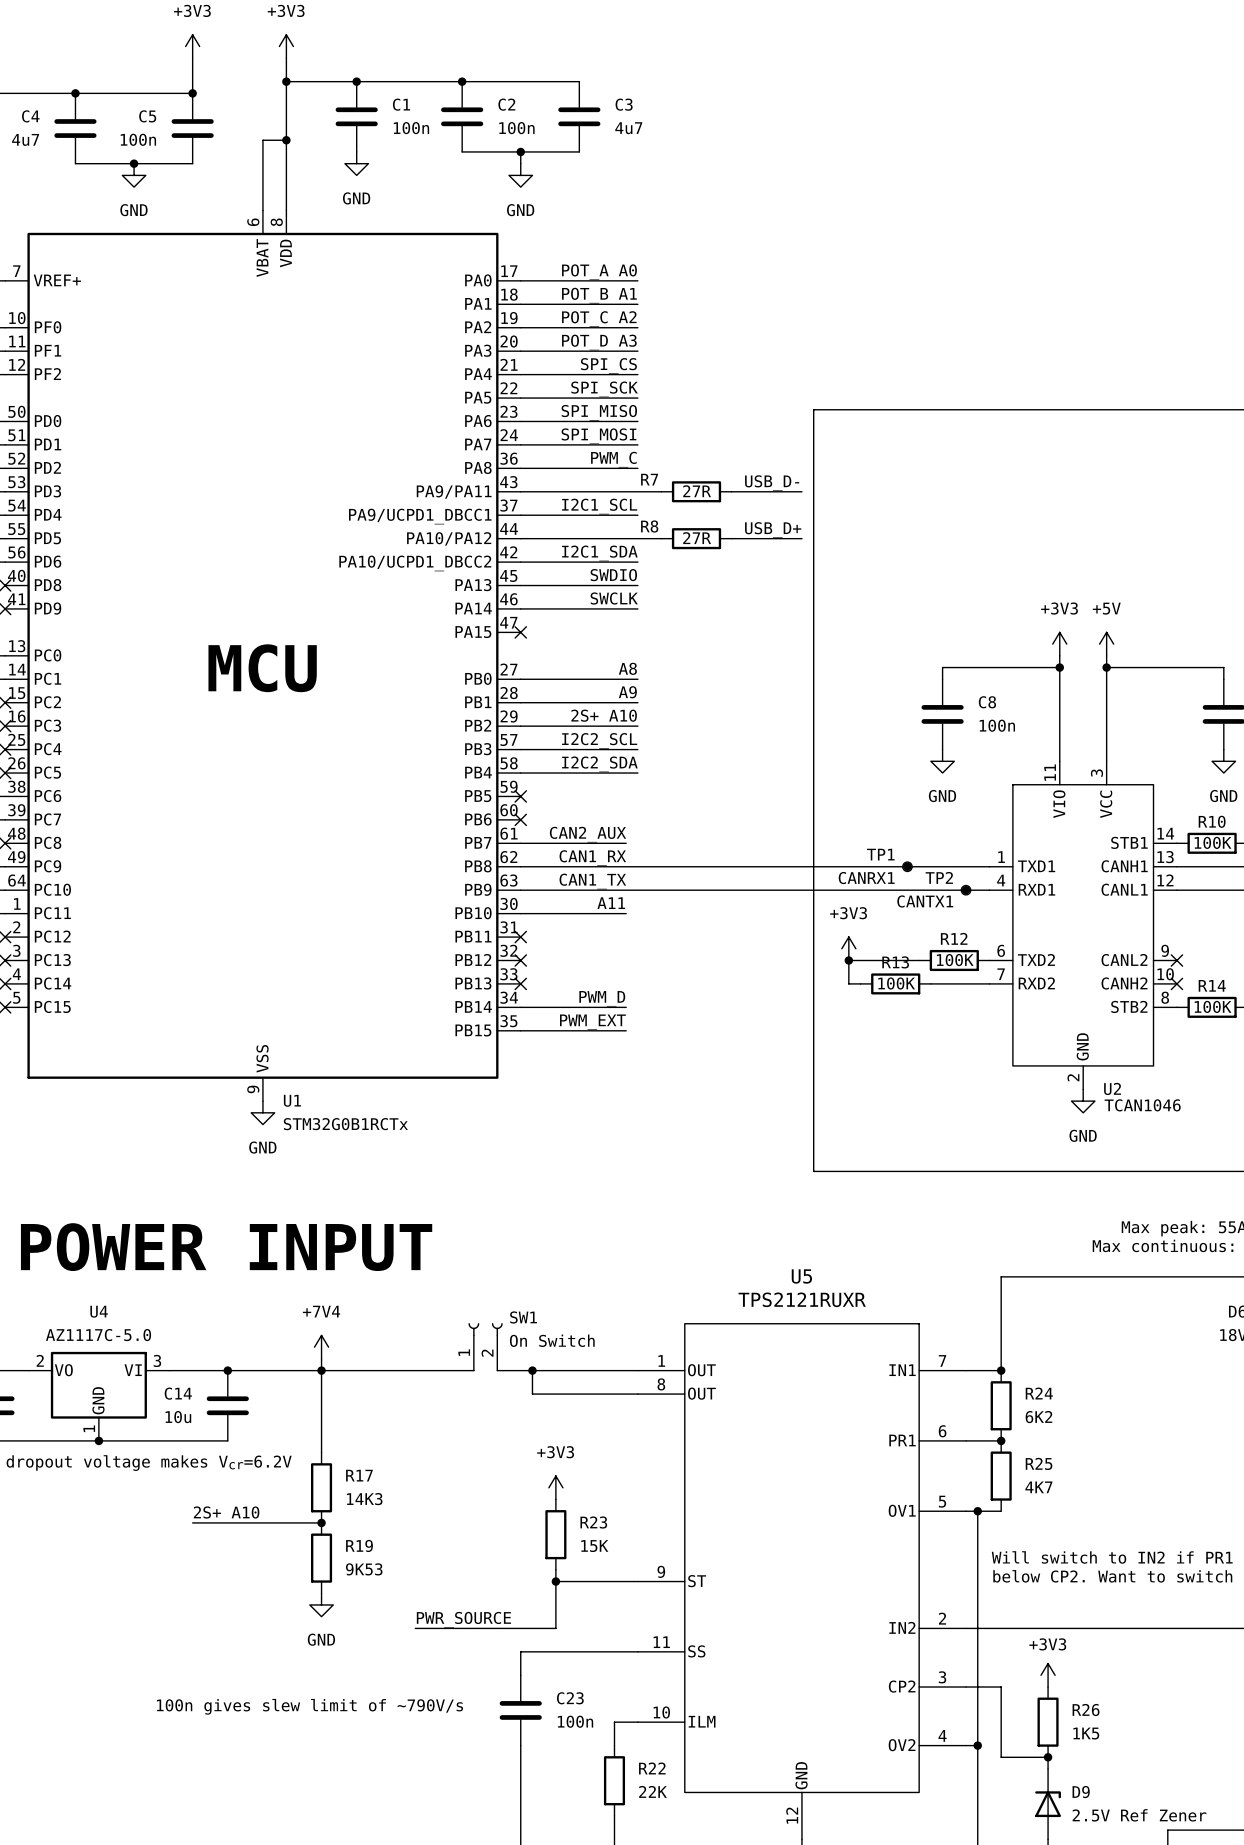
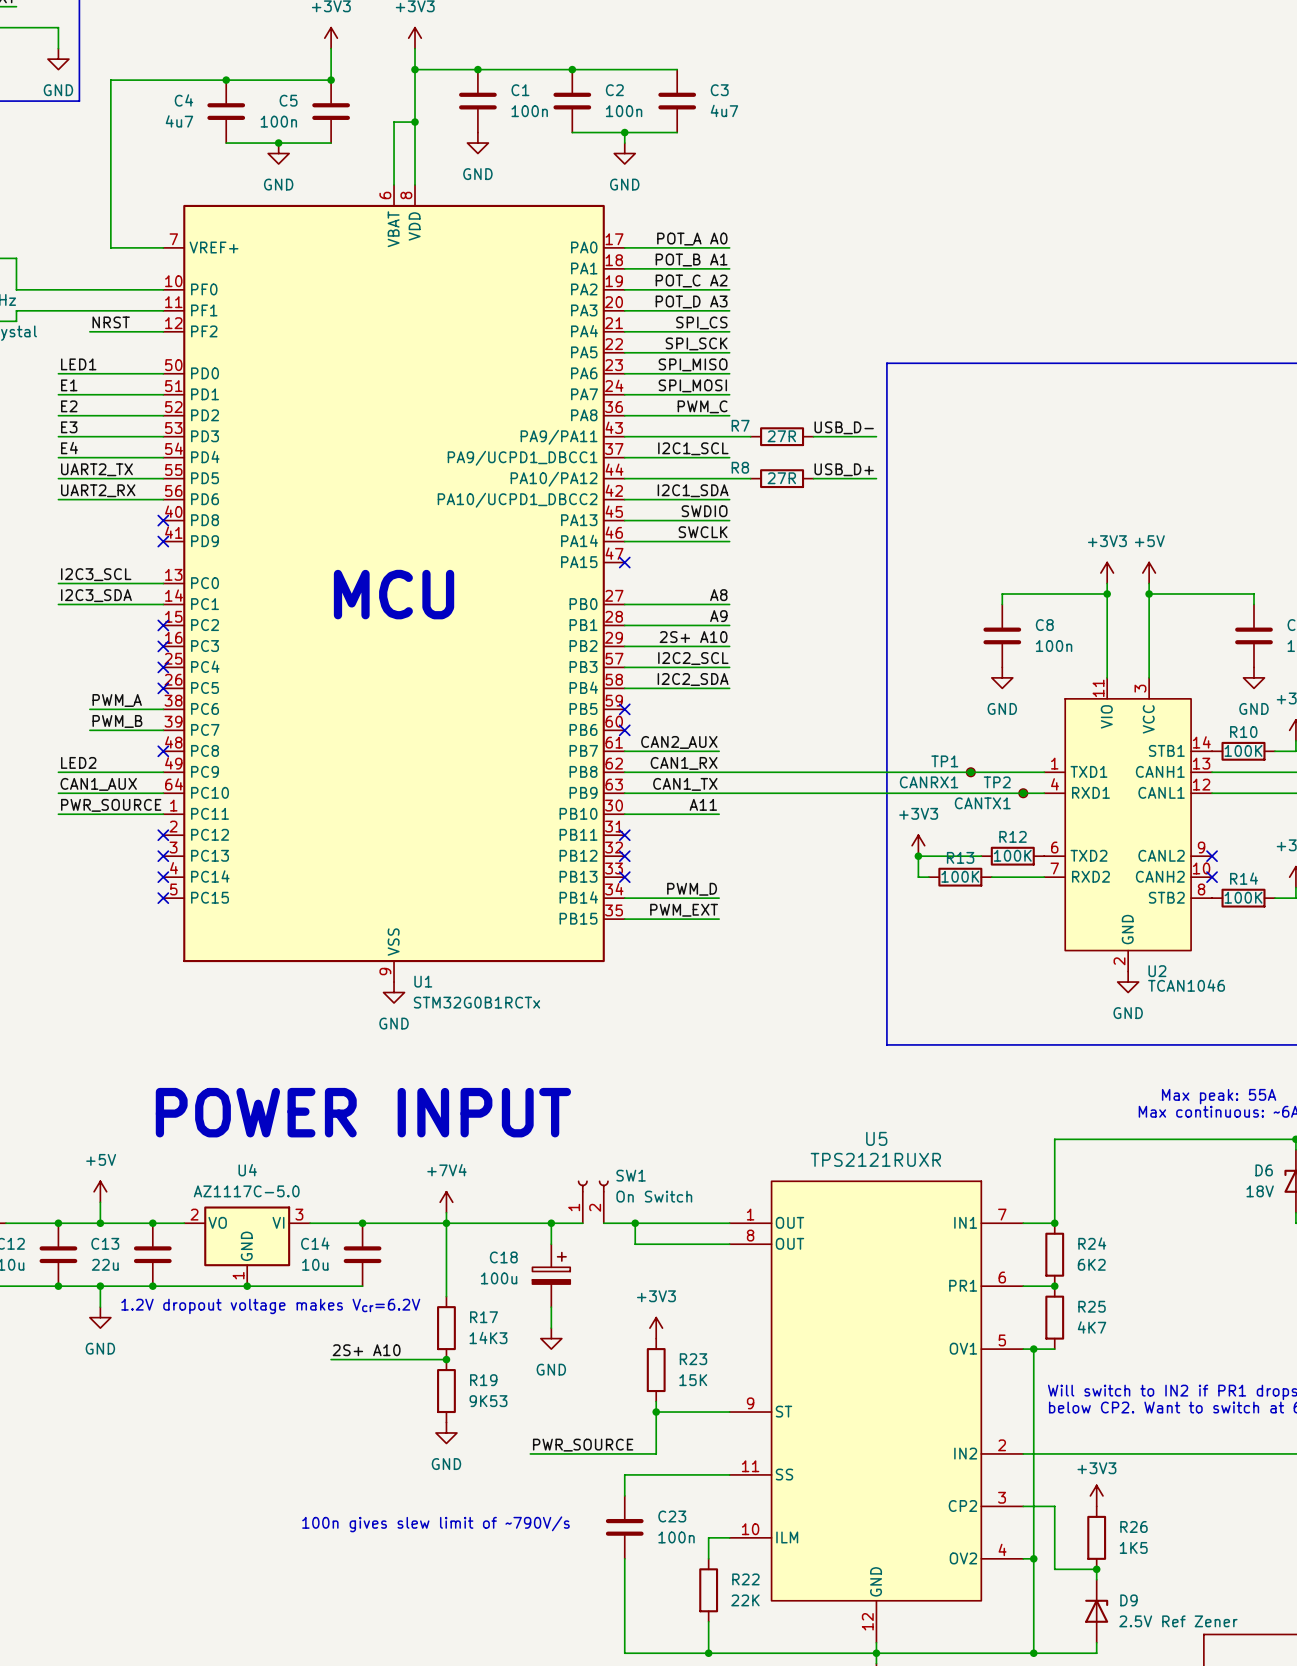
wire: none -> (551, 1223) (551, 1244)
junction: none -> (551, 1223)
C18: none -> 100u (551, 1275)
wire: none -> (551, 1307) (551, 1328)
power symbol: none -> GND (551, 1338)

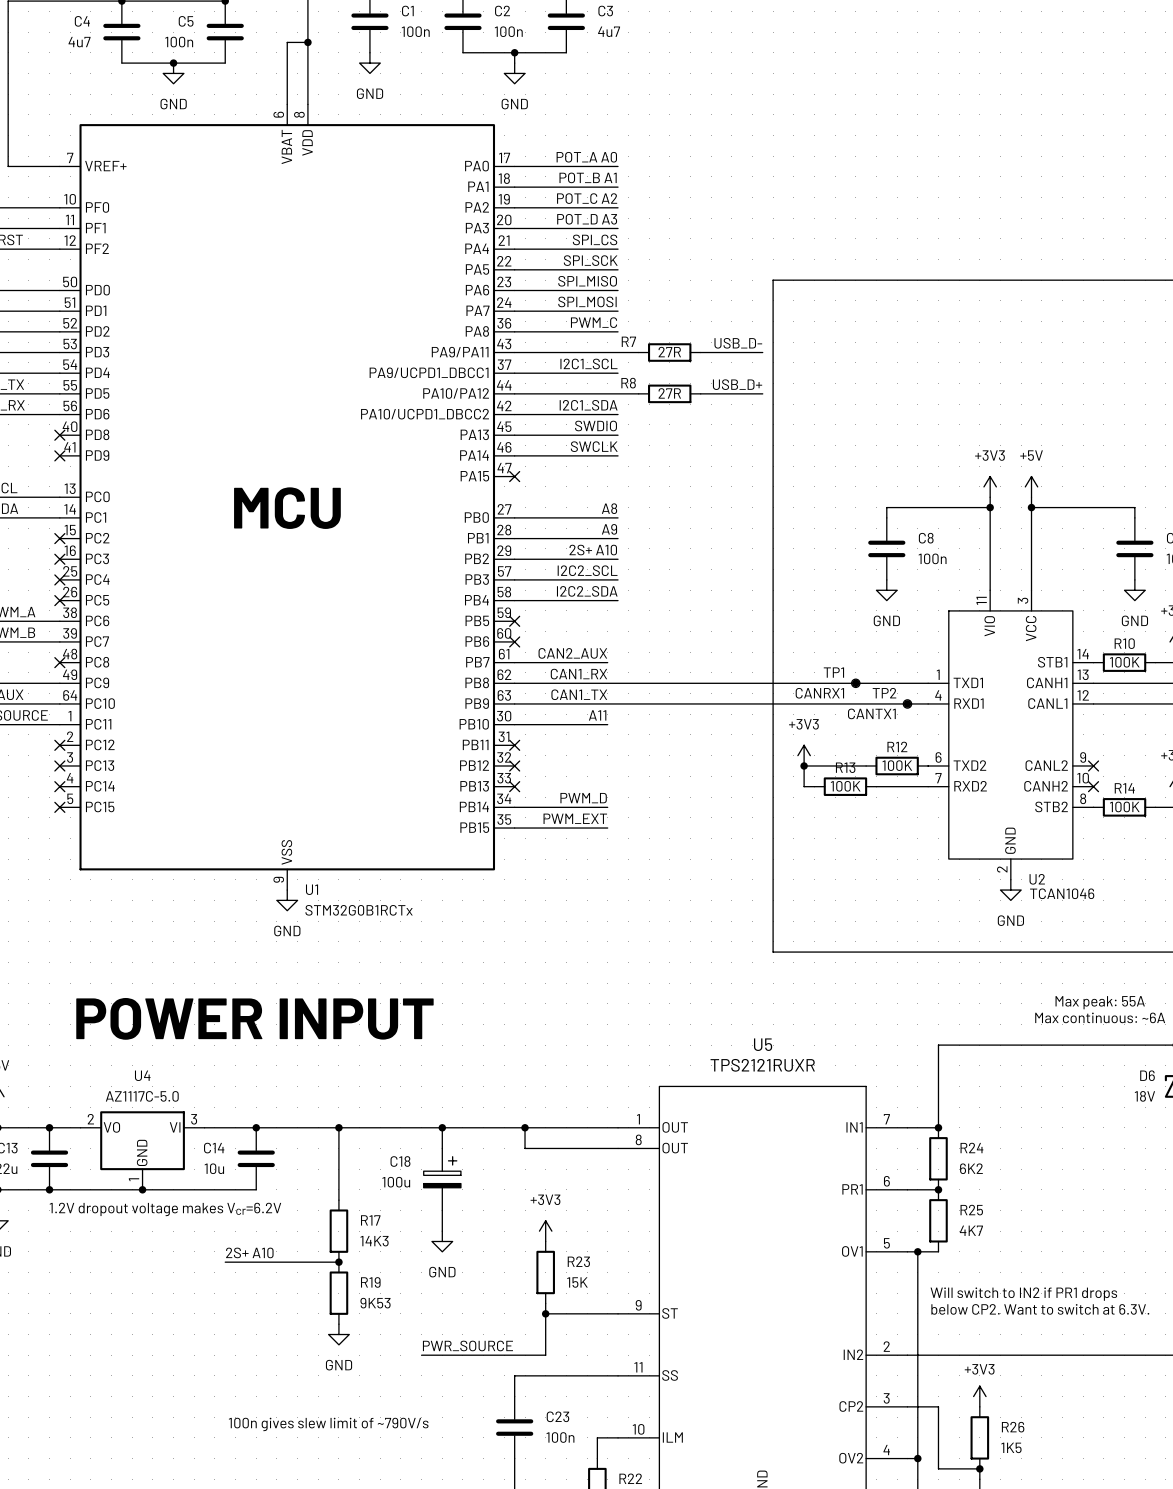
SW1: On Switch (593, 1201) -> none
power symbol: +7V4 (446, 1202) -> none
wire: (446, 1212) (446, 1223) -> none
wire: none -> (473, 1127) (493, 1127)

